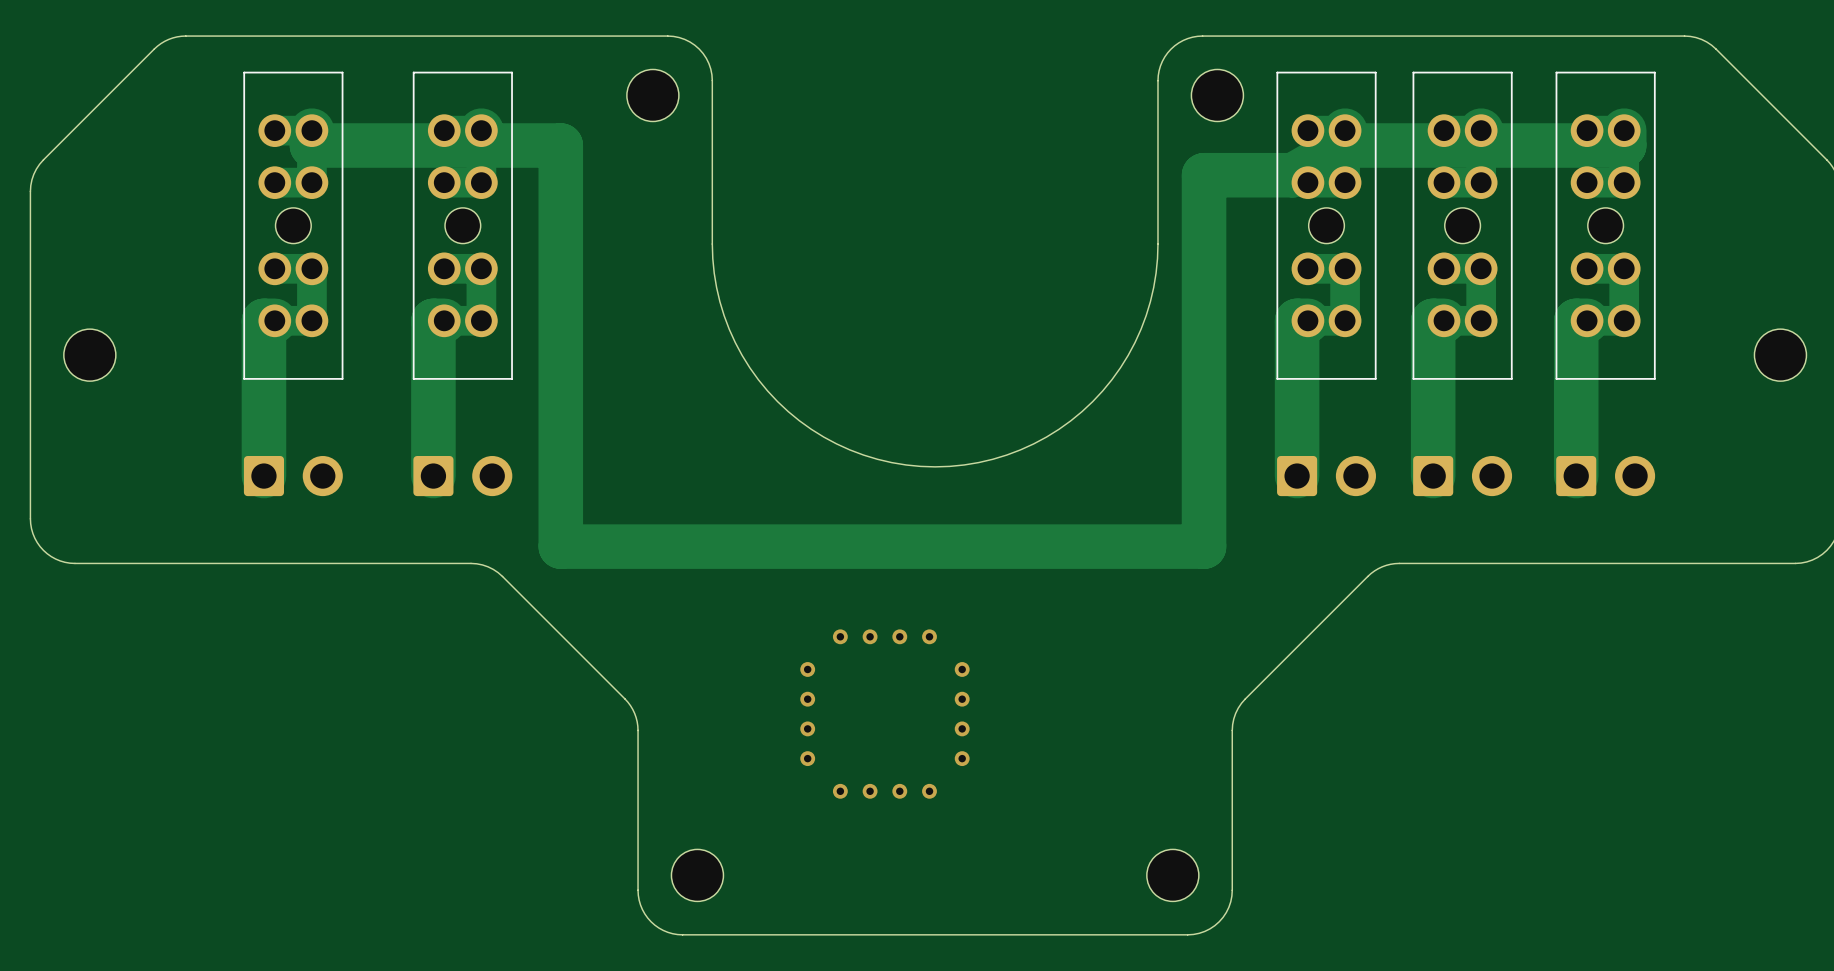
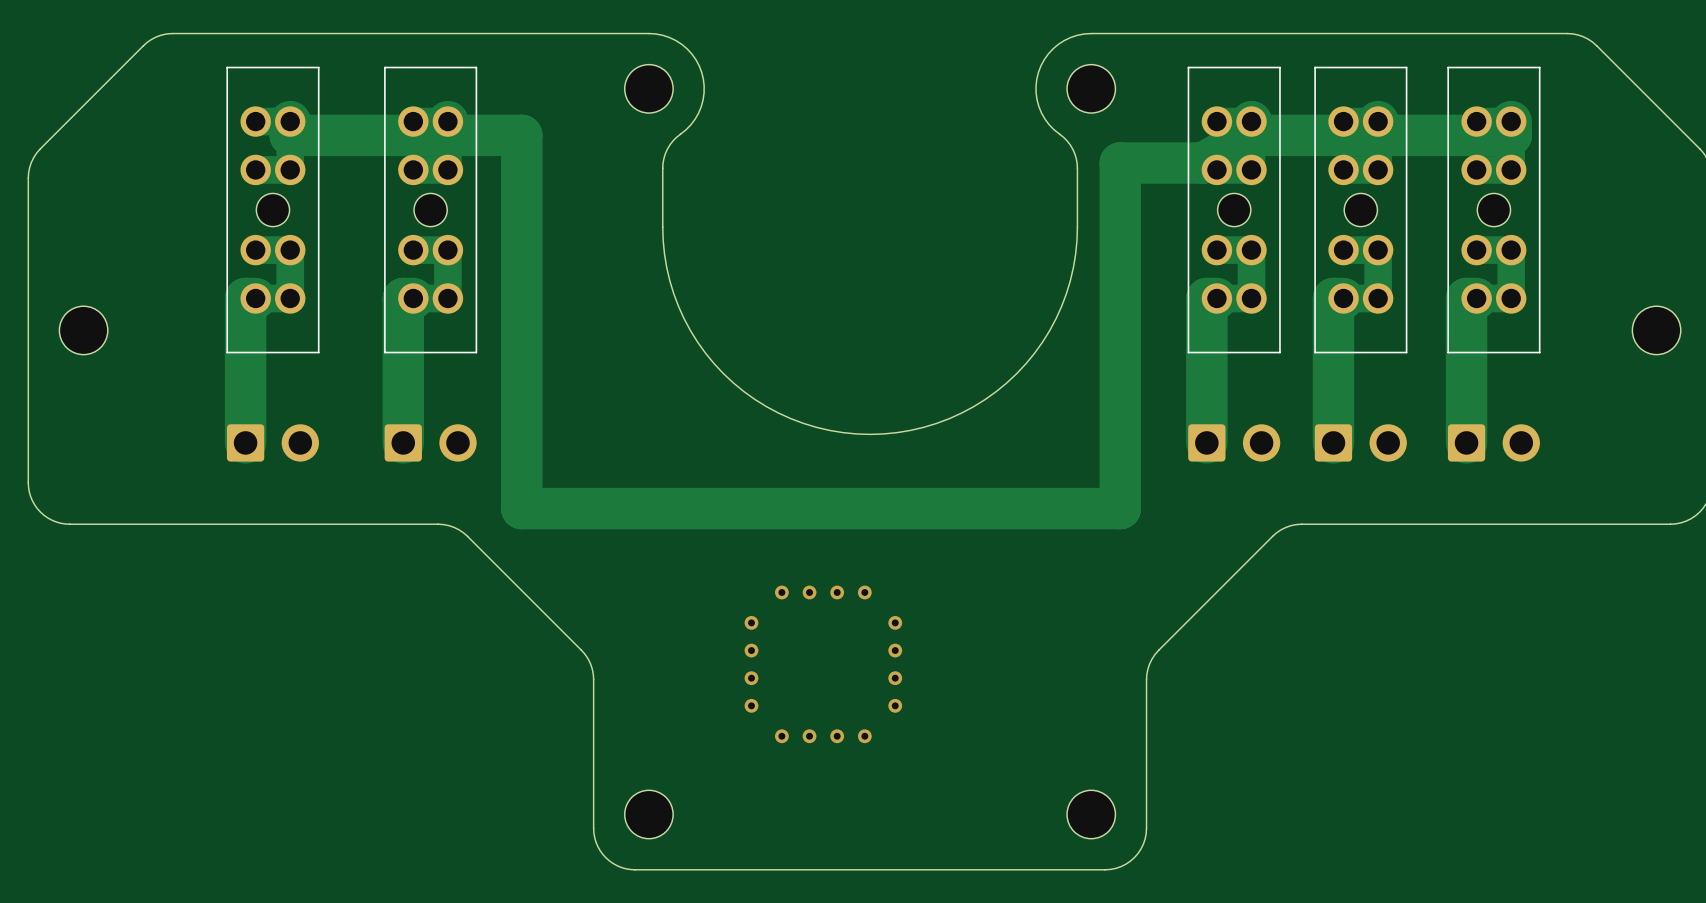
board edge: (667, 36) (679, 37) (694, 45) (706, 58) (710, 69) (712, 180) -> (621, 33) (655, 33) (675, 40) (691, 53) (701, 72) (704, 93) (701, 106) (690, 124) (670, 144) (663, 158) (662, 168)
board edge: (1202, 36) (1187, 38) (1174, 45) (1164, 56) (1160, 65) (1157, 80) (1157, 180) -> (1118, 33) (1084, 33) (1064, 40) (1048, 53) (1038, 72) (1036, 86) (1038, 106) (1049, 124) (1070, 144) (1076, 158) (1077, 168)
part position: (652, 95) -> (648, 88)
part position: (1217, 95) -> (1091, 88)

